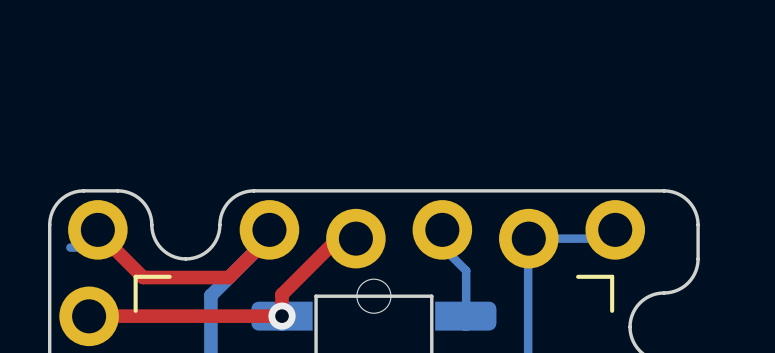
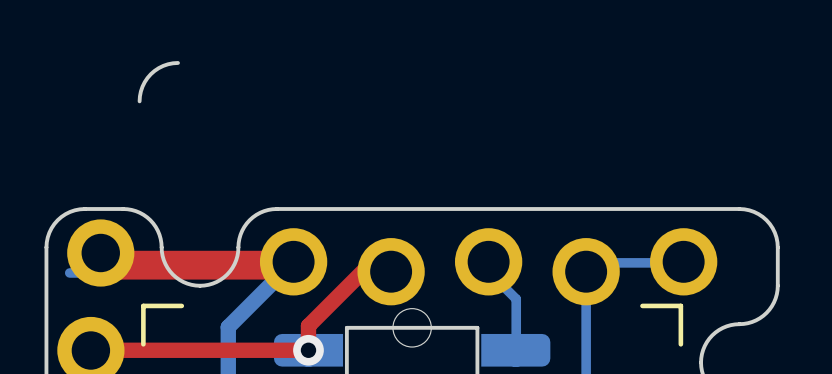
board edge: none -> (177, 62) (163, 65) (150, 74) (142, 86) (139, 101)
part footprint: [239, 200, 646, 269] -> [259, 228, 718, 306]
top track: (106, 240) (143, 277) (229, 277) (265, 240) -> (110, 265) (290, 265)

